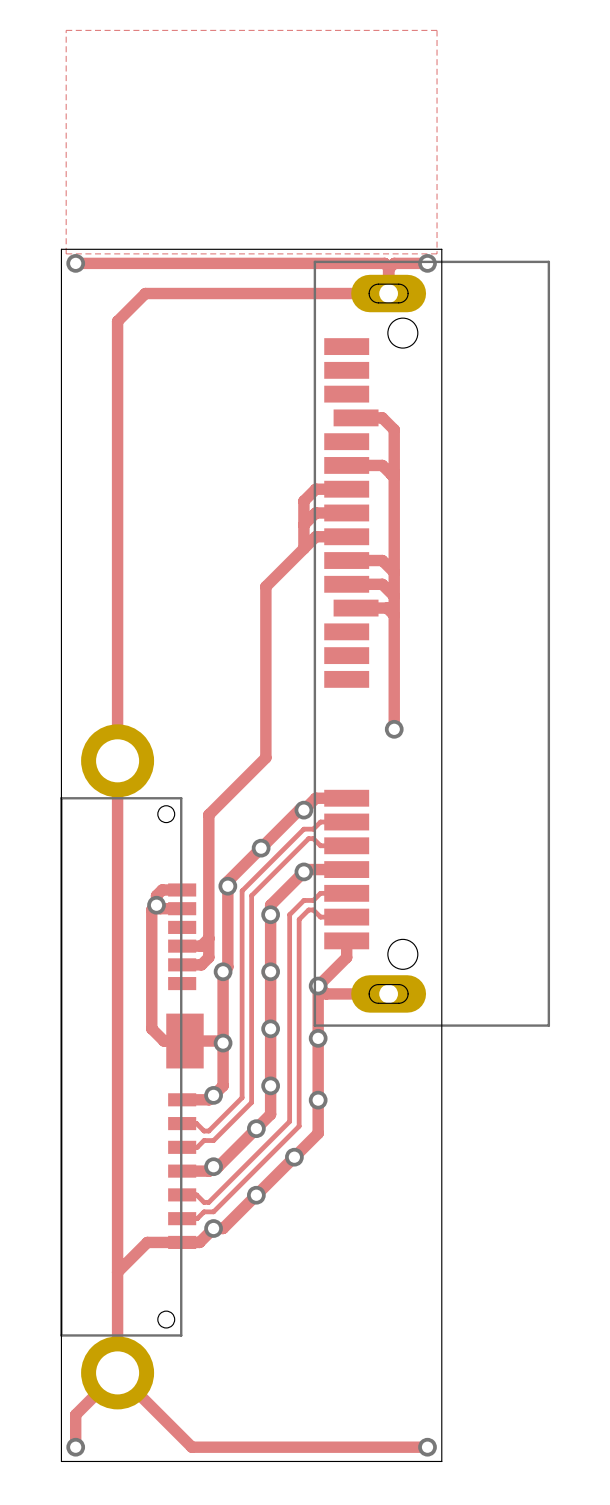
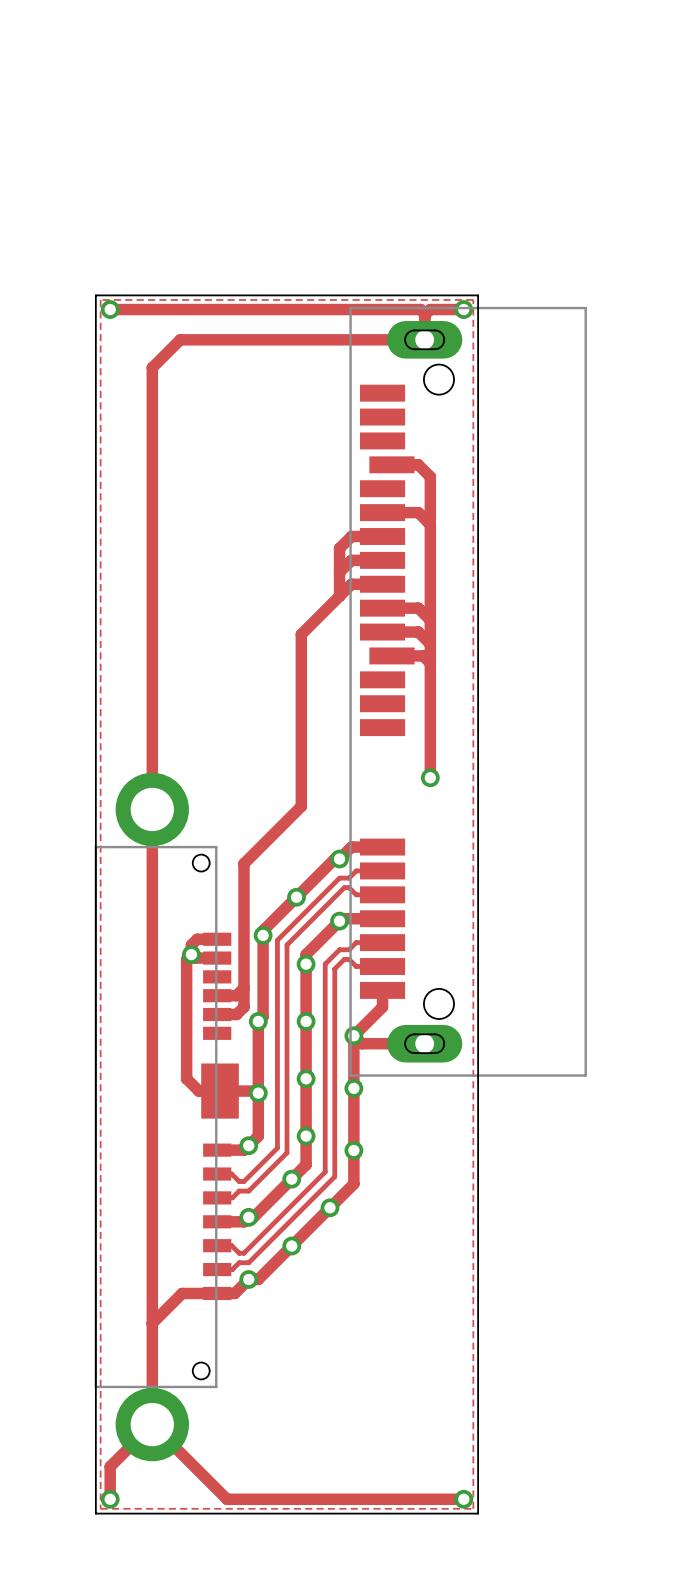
zone outline: (66, 253) (66, 30) (437, 30) (437, 253) -> (100, 299) (100, 1508) (473, 1508) (473, 299)

